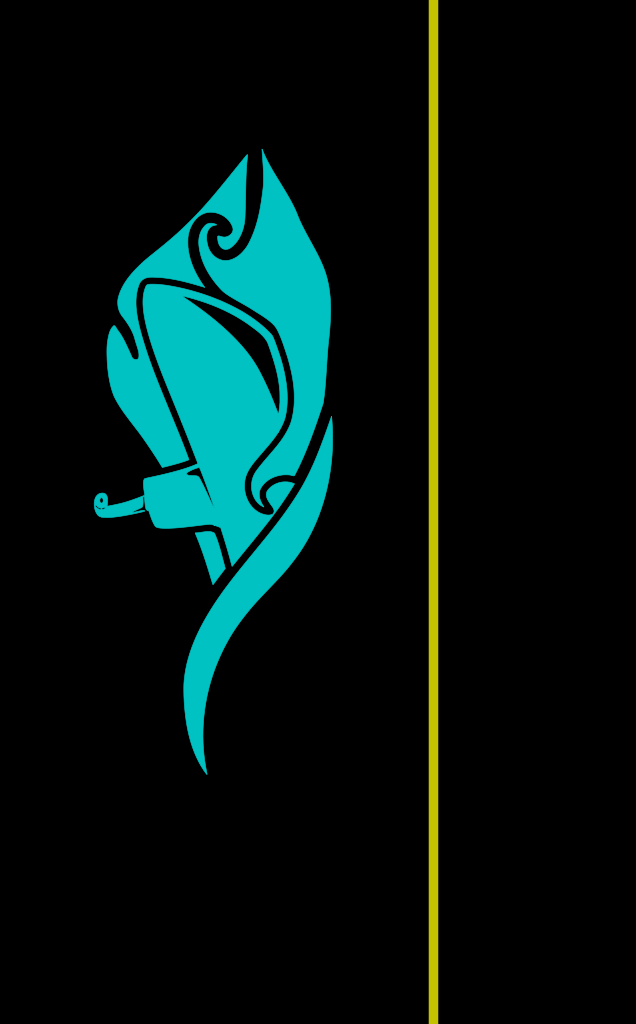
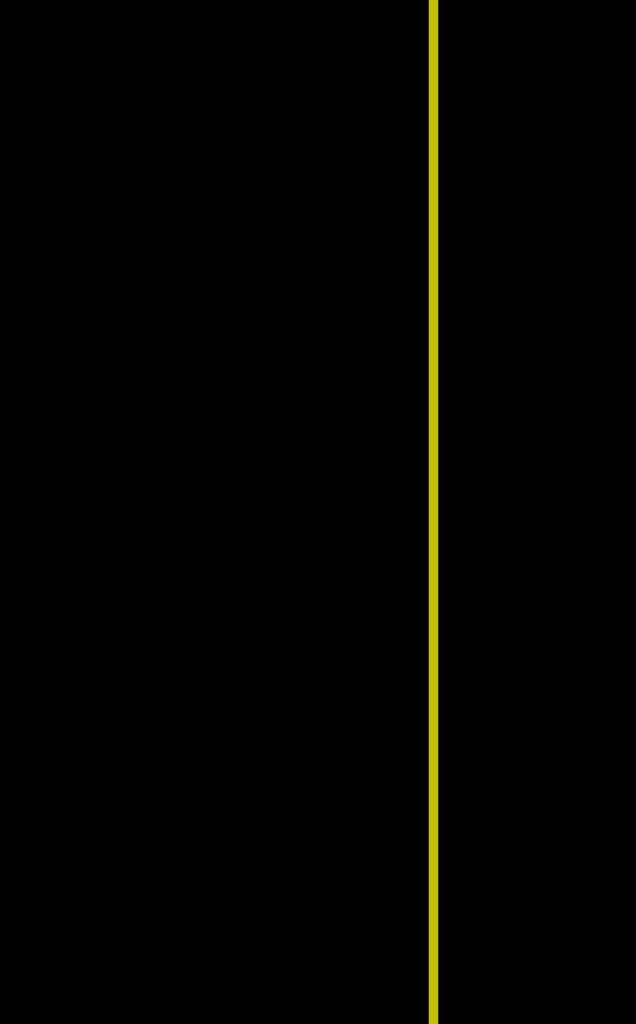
drawing: [93, 148, 333, 775] -> none

